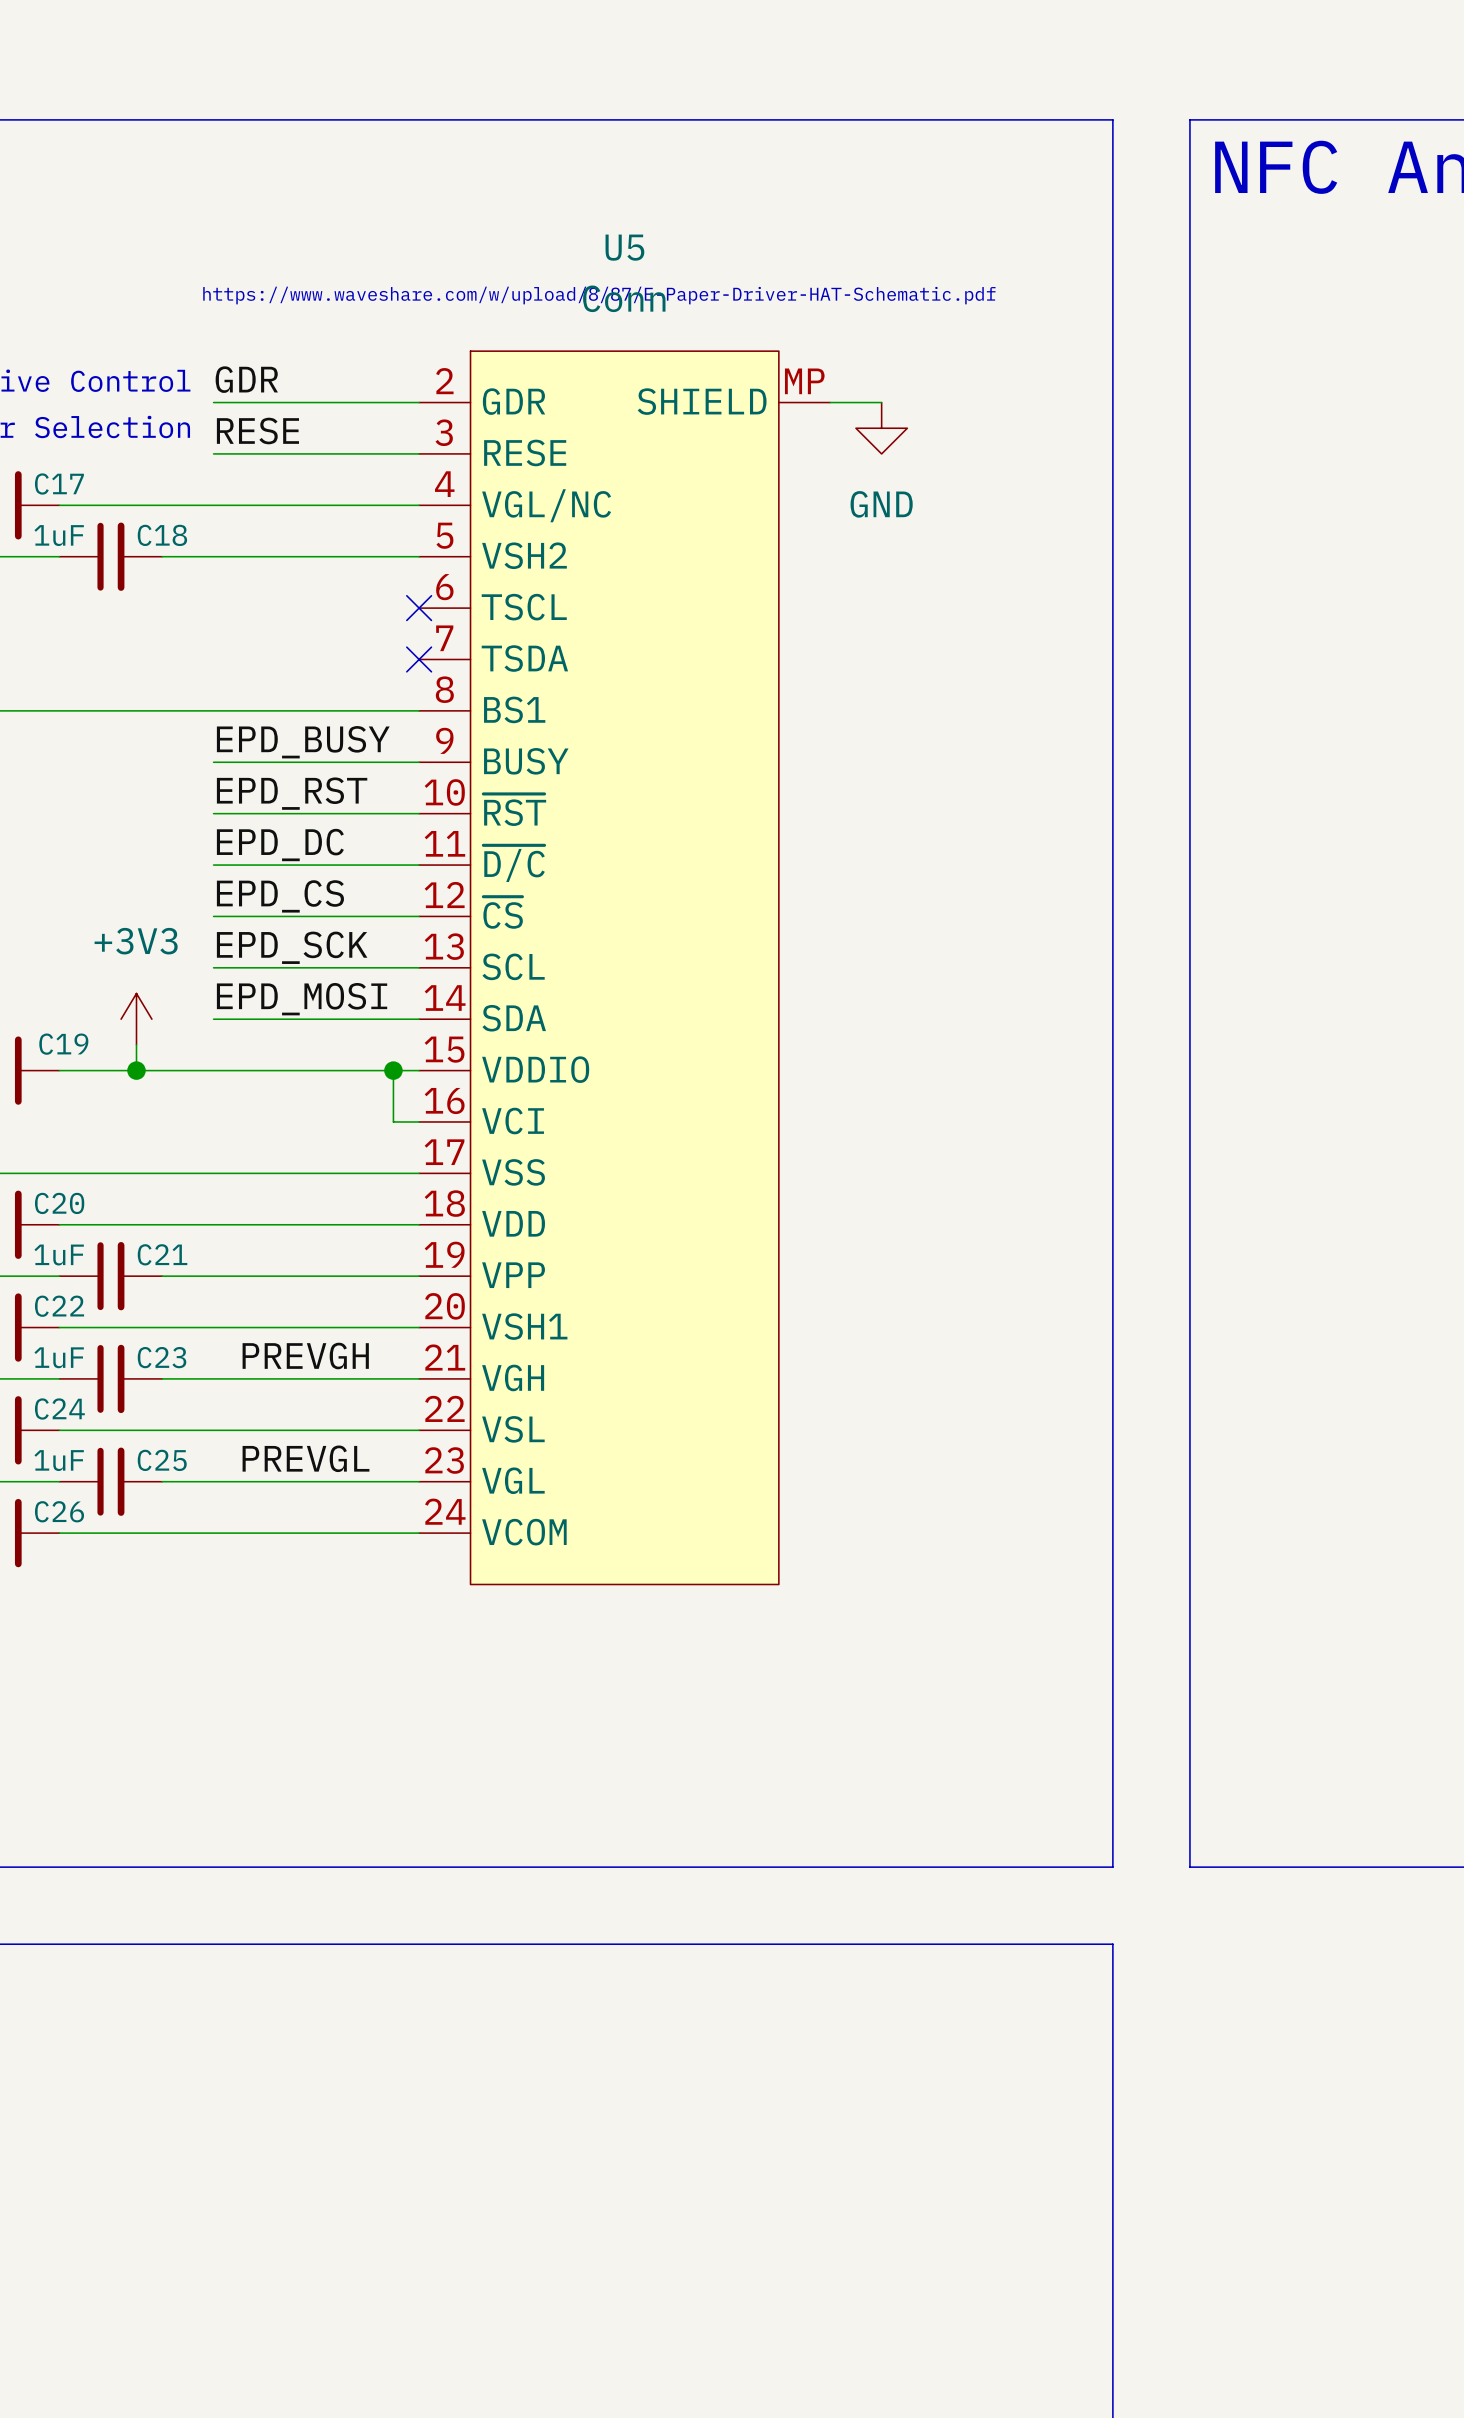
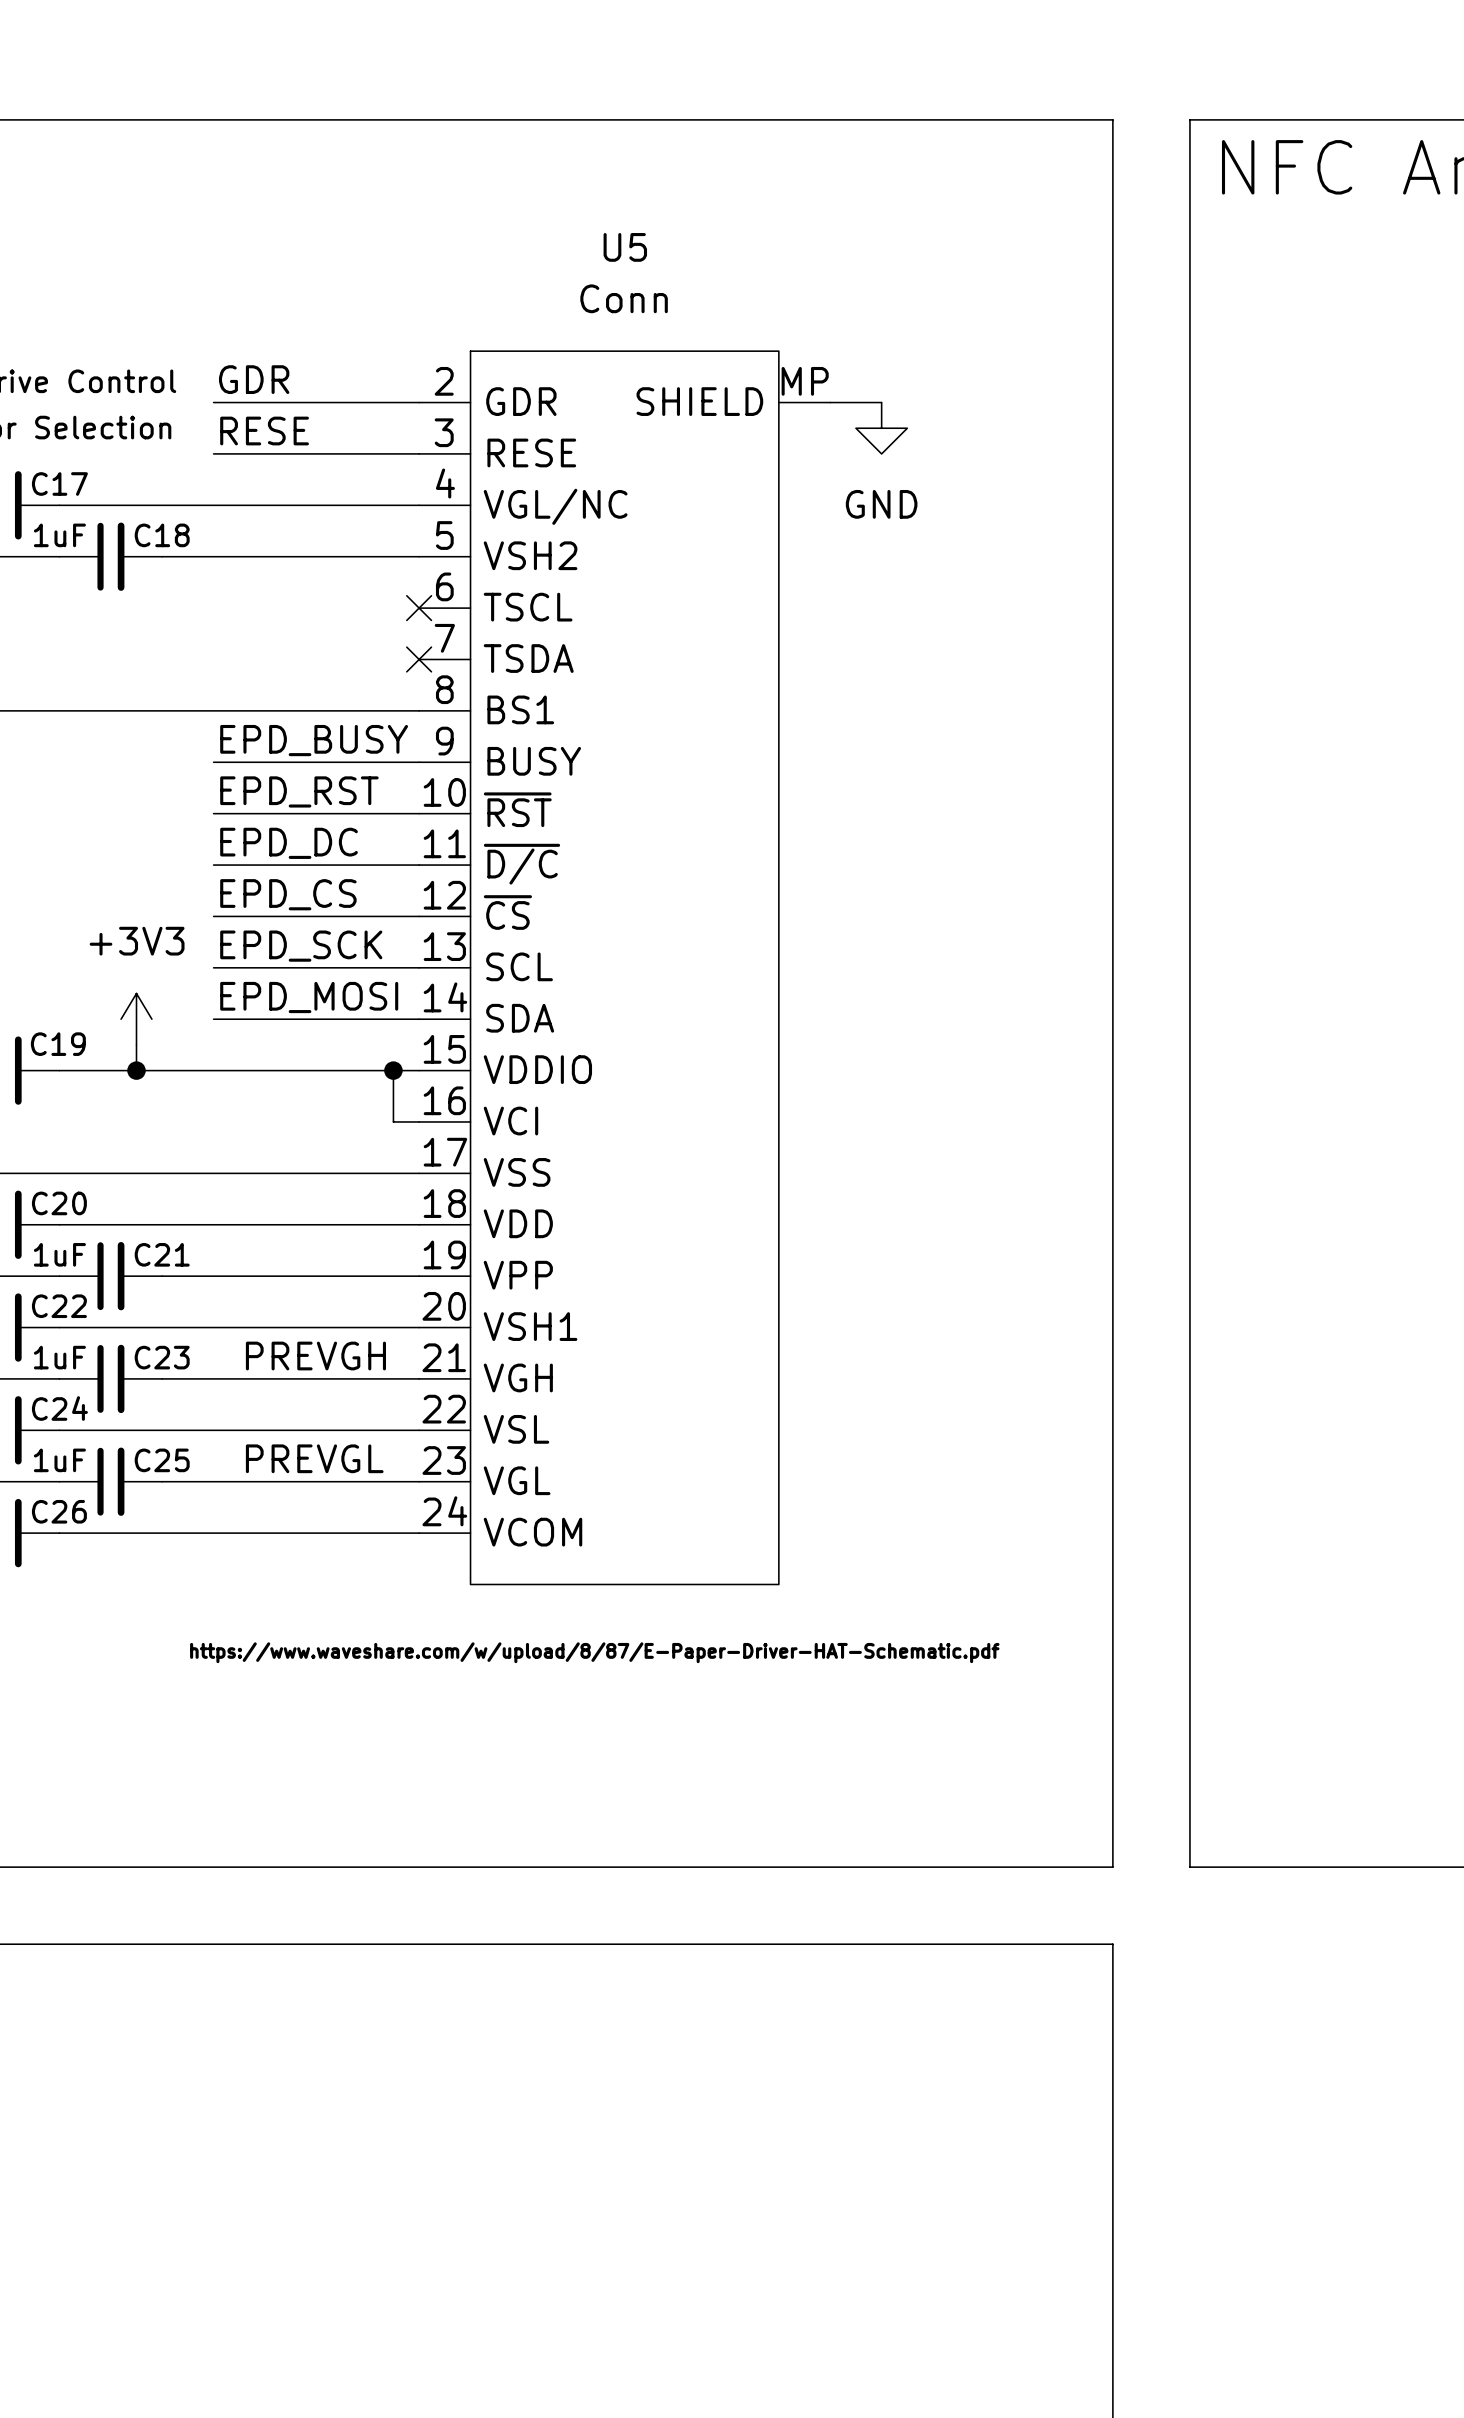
text: https://www.waveshare.com/w/upload/8/87/E-Paper-Driver-HAT-Schematic.pdf (599, 295) -> none
text: none -> https://www.waveshare.com/w/upload/8/87/E-Paper-Driver-HAT-Schematic.pdf (594, 1652)

